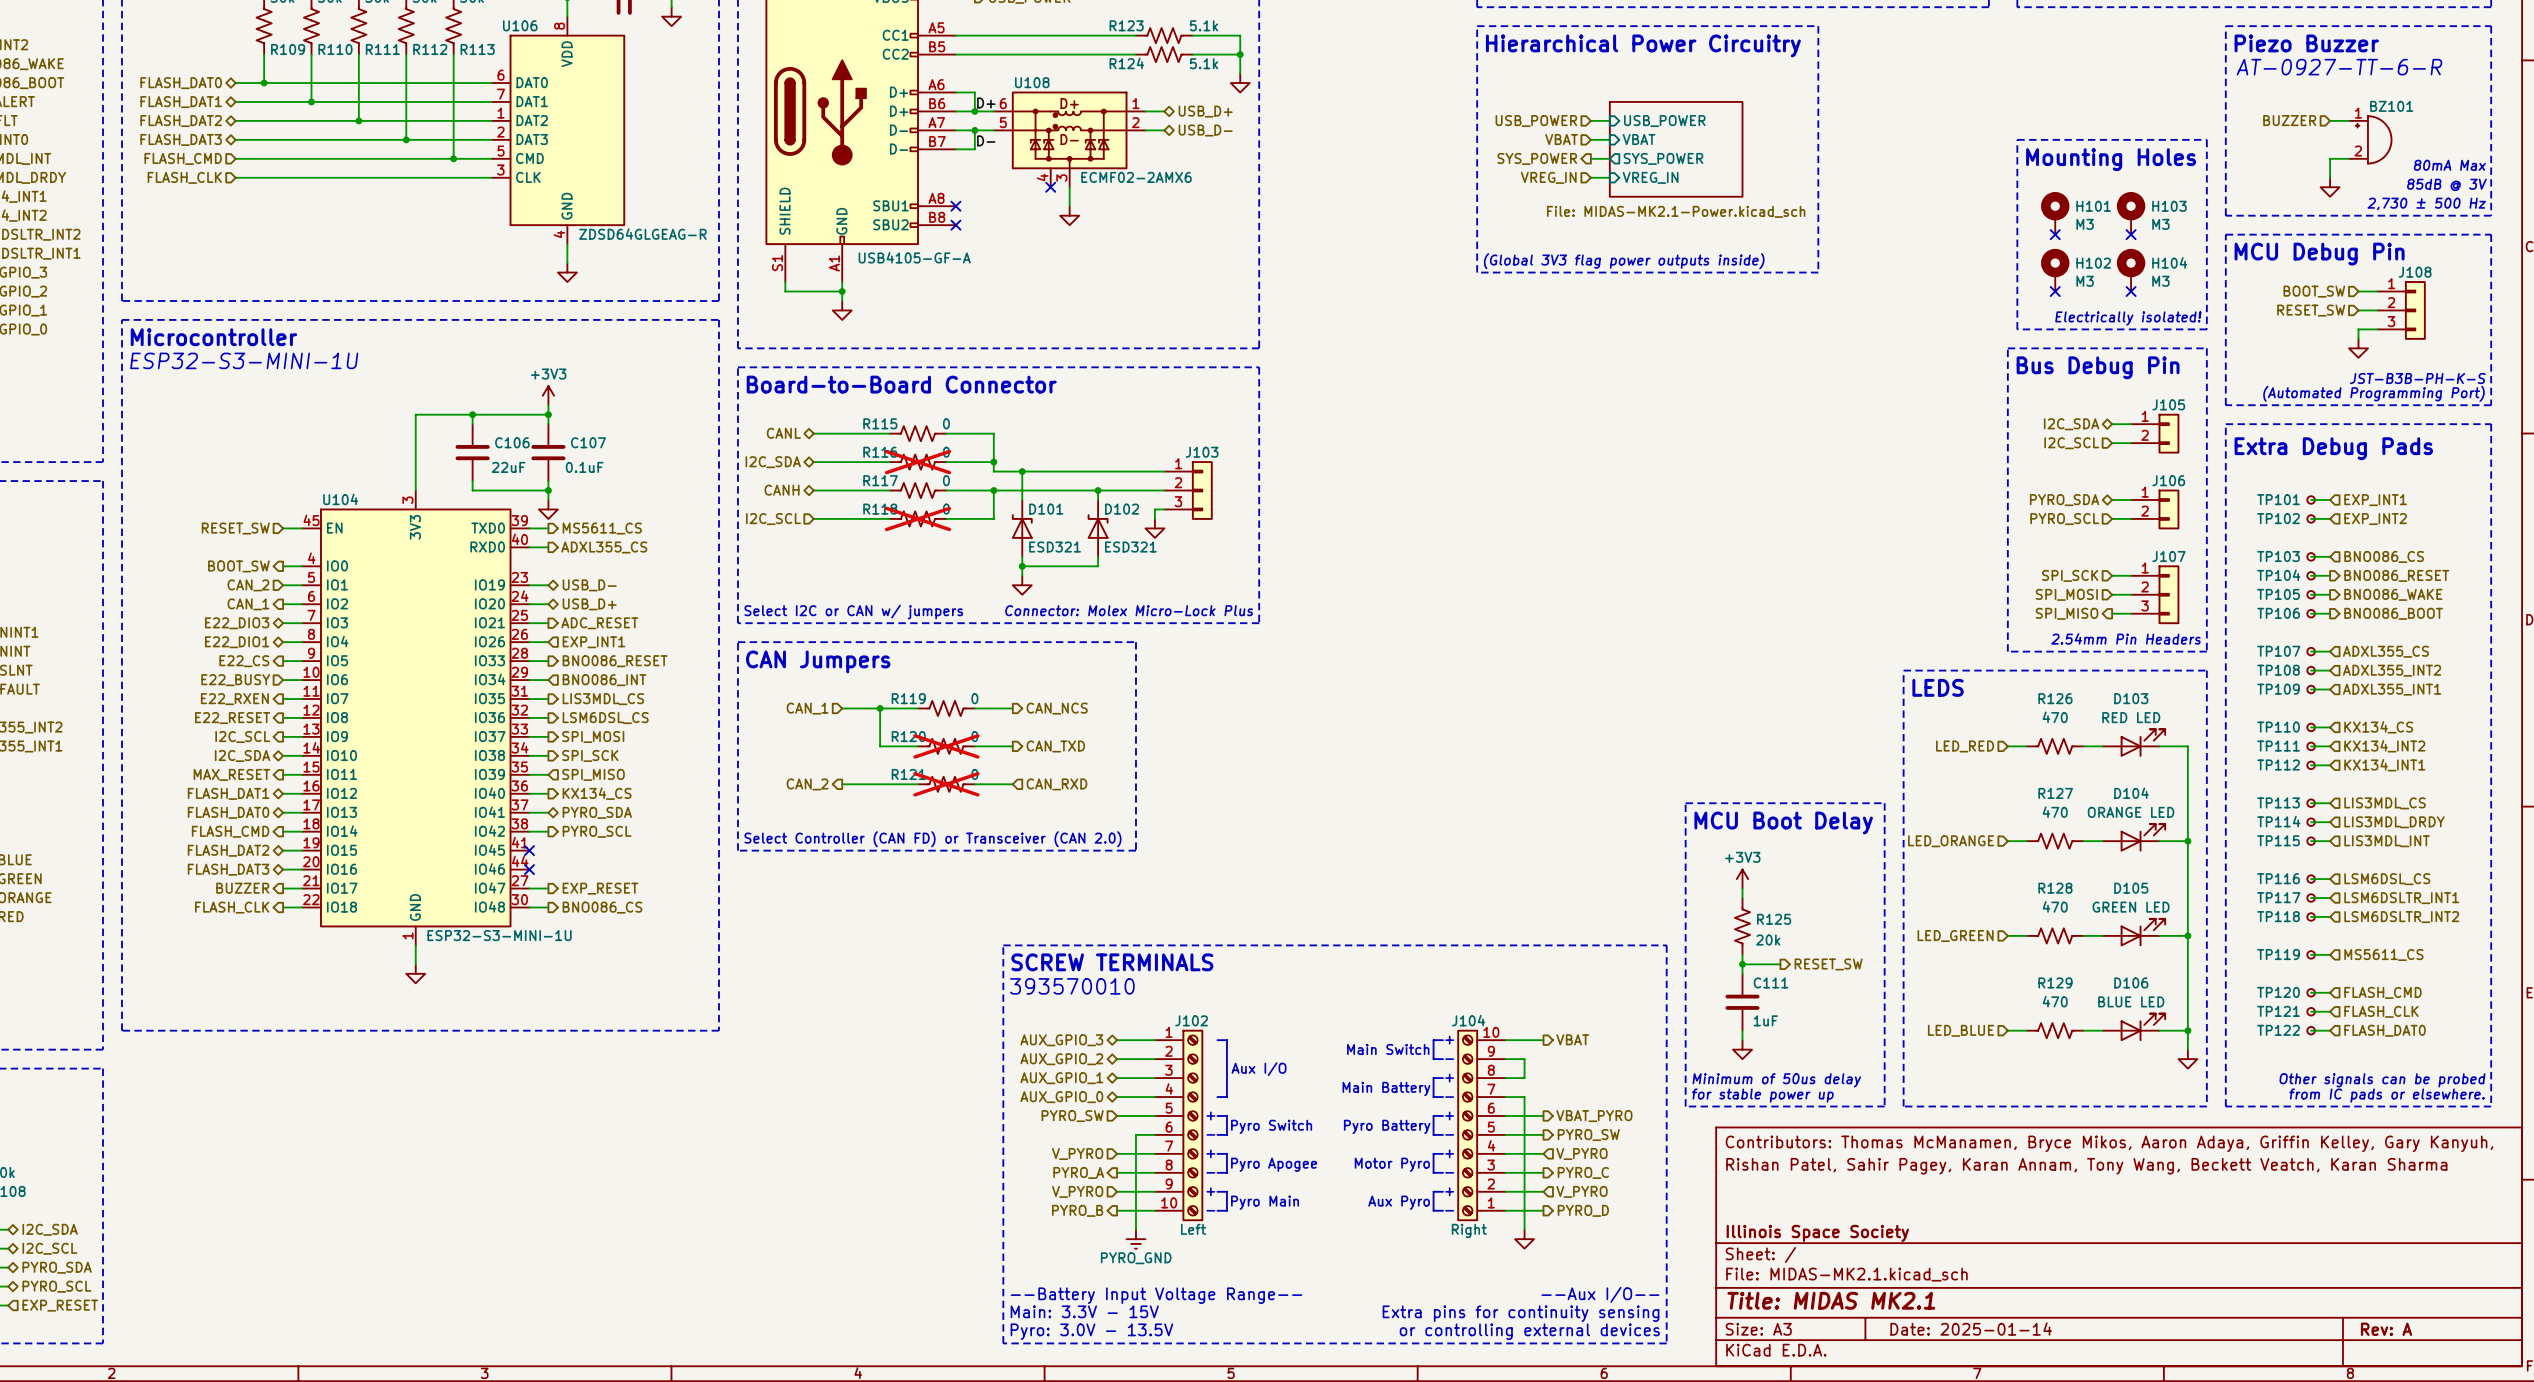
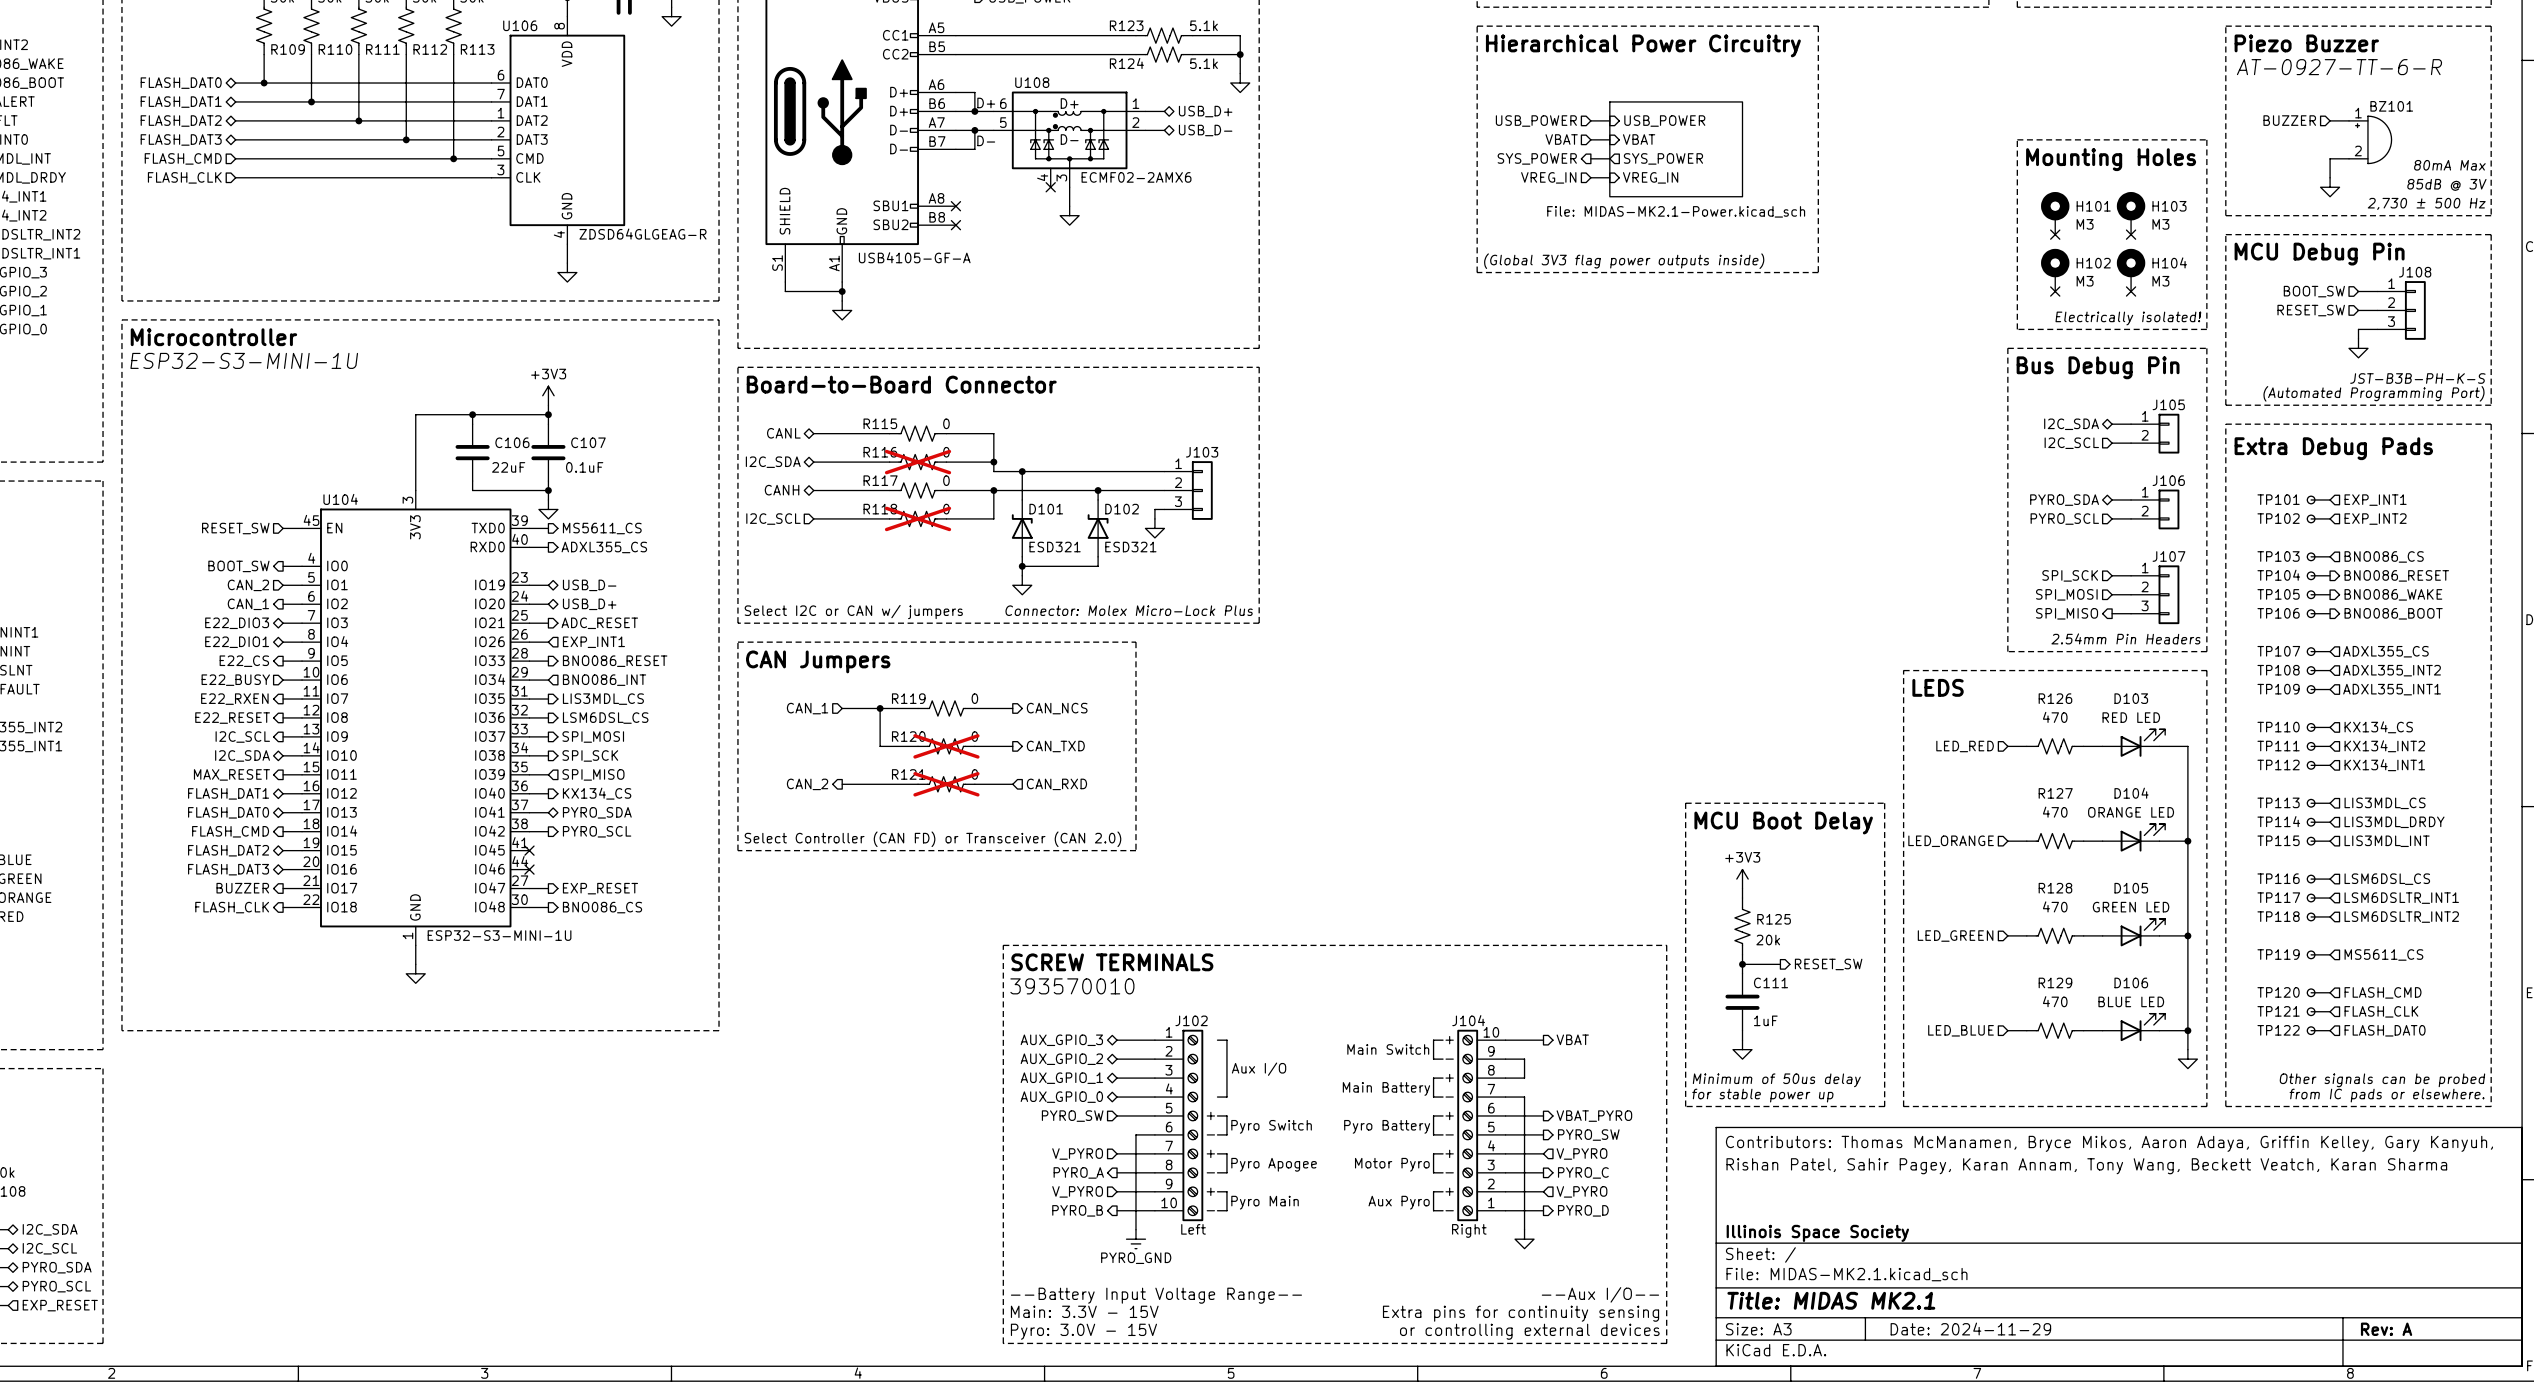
title block: Date: 2025-01-14 (1971, 1329) -> Date: 2024-11-29 (1970, 1329)
text: Pyro: 3.0V - 13.5V (1091, 1331) -> Pyro: 3.0V - 15V (1083, 1331)

